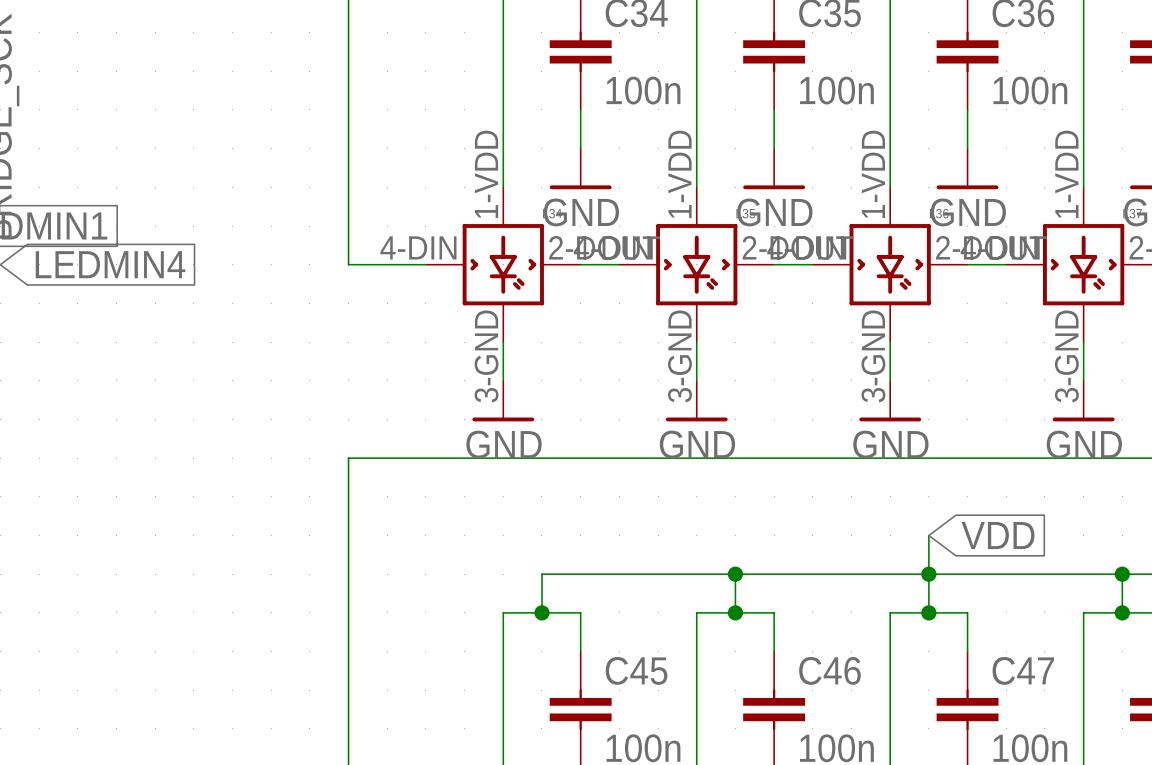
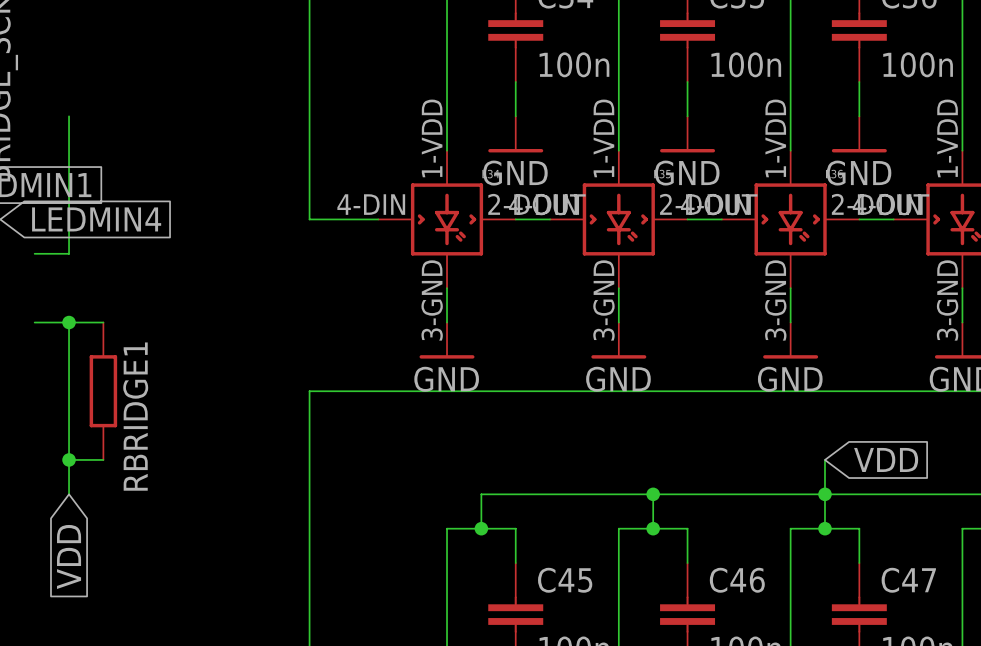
wire: none -> (69, 116) (69, 253) (34, 253)
wire: none -> (34, 322) (103, 322)
wire: none -> (69, 322) (69, 494)
junction: none -> (69, 322)
RBRIDGE1: none -> (103, 391)
wire: none -> (69, 459) (103, 459)
junction: none -> (69, 459)
global label: none -> VDD (69, 556)

